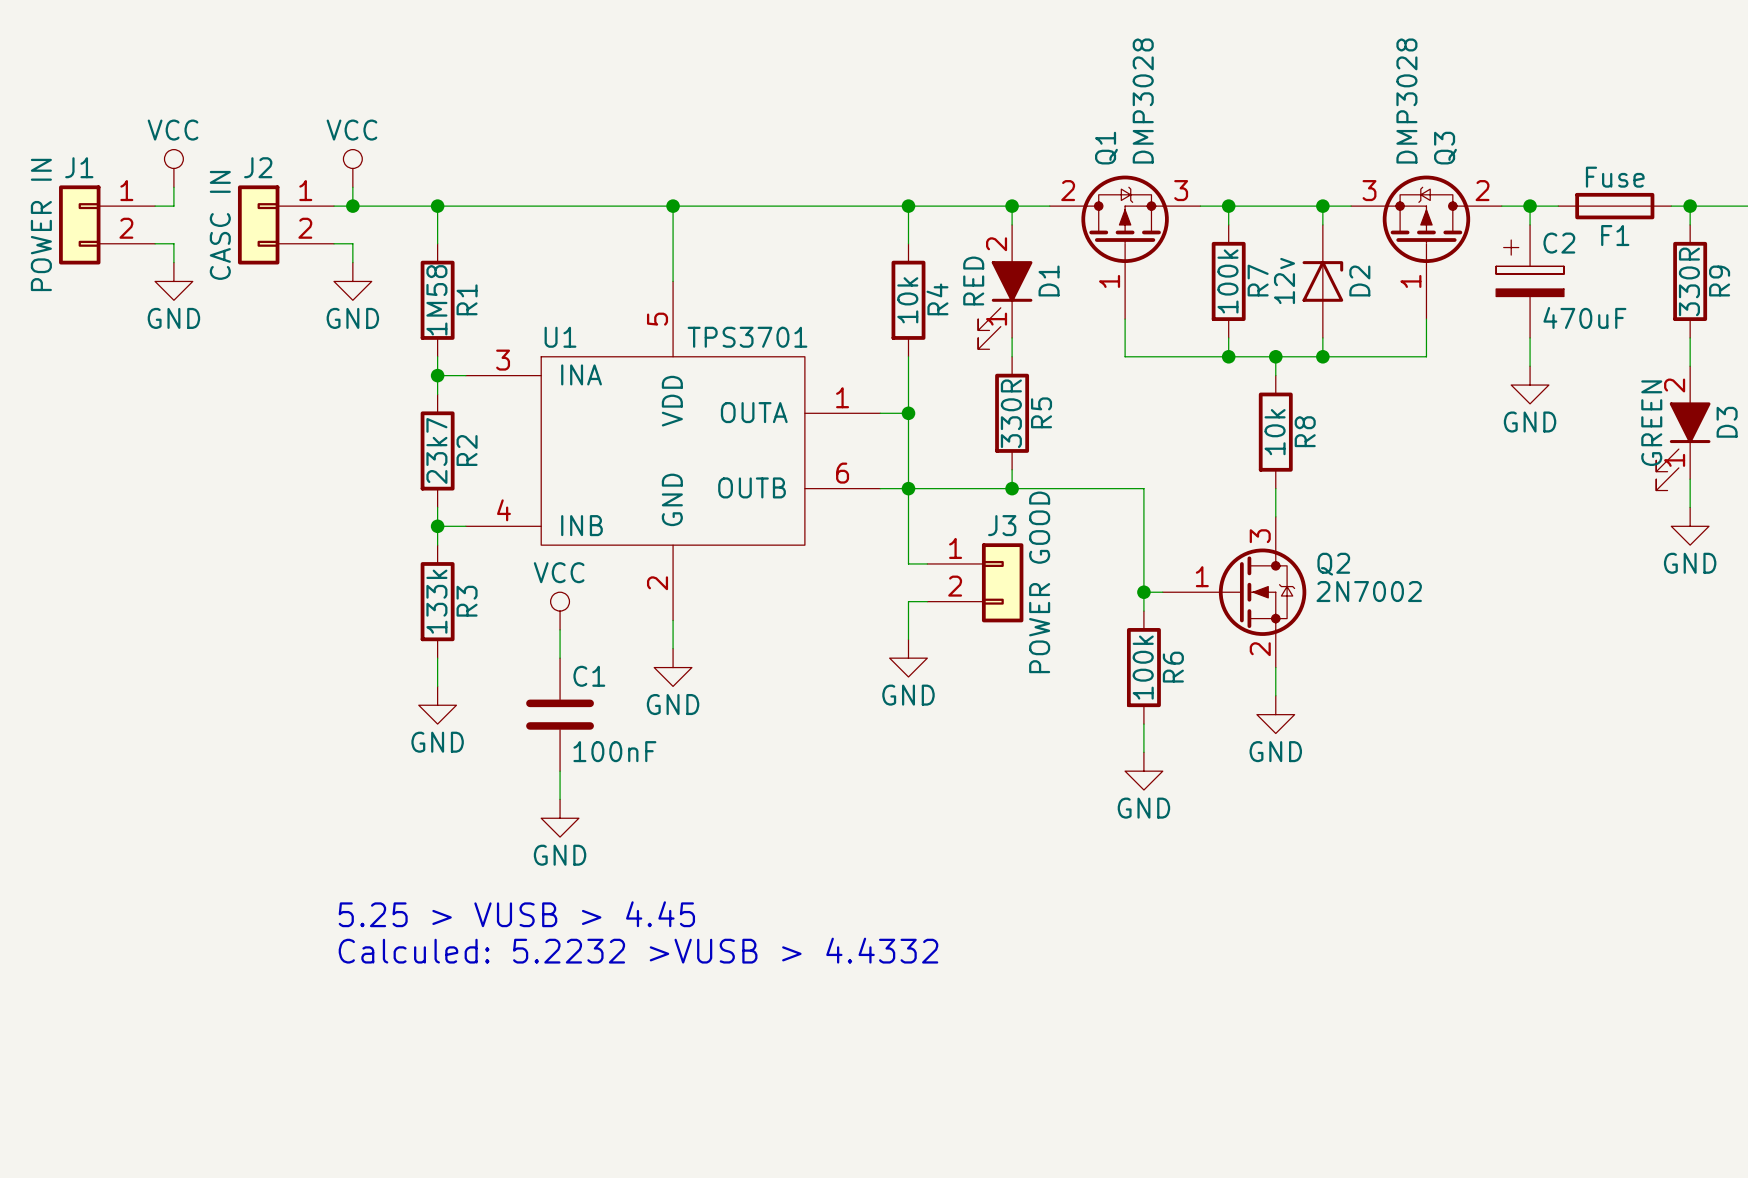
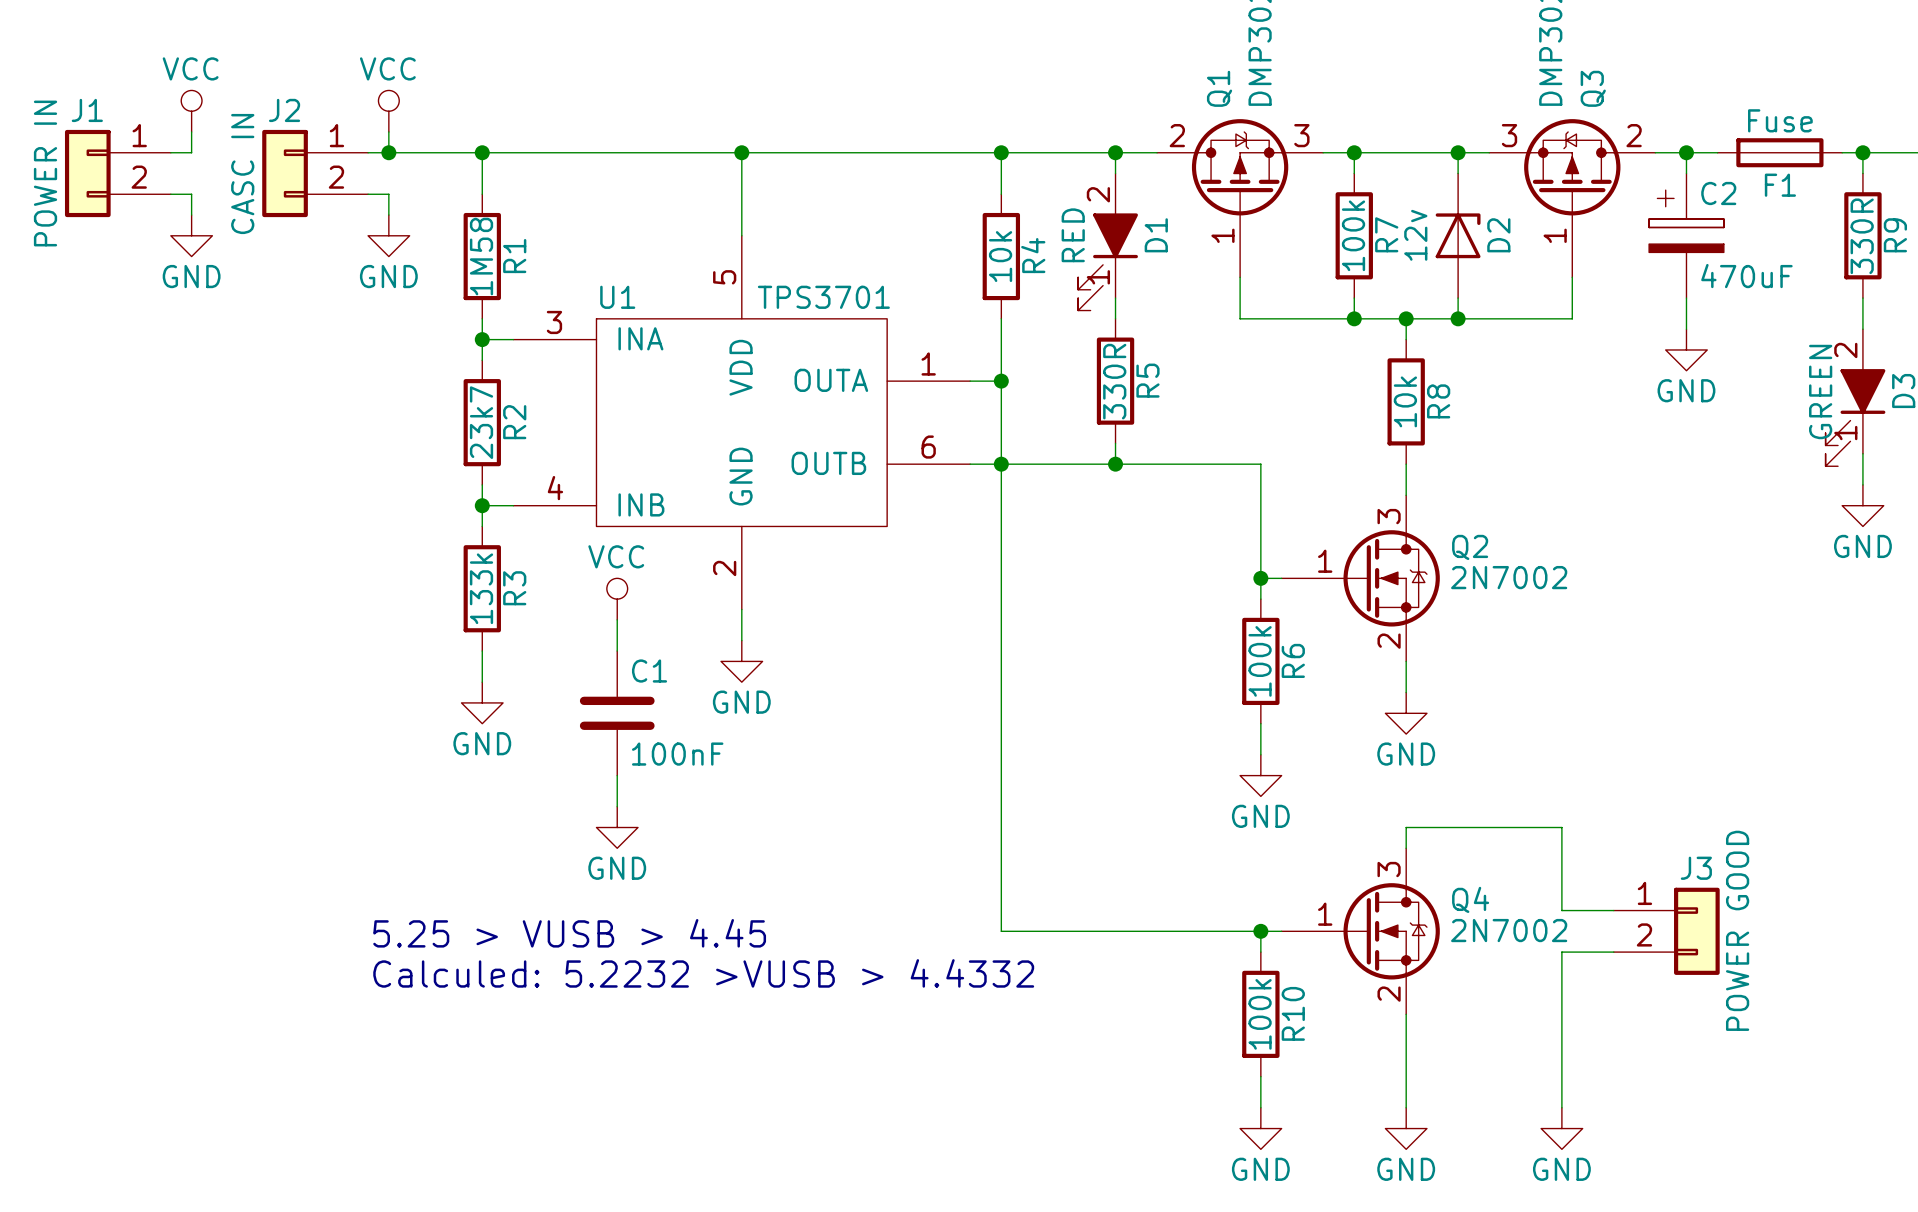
wire: (908, 563) (927, 563) -> (1001, 547) (1001, 588)
J3 position: (975, 582) -> (1666, 931)
wire: (908, 601) (927, 601) -> none
wire: none -> (1001, 630) (1001, 931) (1281, 931)
power symbol: GND (908, 658) -> none
wire: none -> (1406, 848) (1406, 827) (1561, 827) (1561, 910) (1613, 910)
wire: none -> (1260, 931) (1260, 952)
junction: none -> (1260, 931)
Q4: none -> 2N7002 (1360, 931)
wire: none -> (1613, 952) (1561, 952) (1561, 1107)
R10: none -> 100k (1260, 1014)
wire: none -> (1406, 1014) (1406, 1107)
wire: none -> (1260, 1076) (1260, 1107)
power symbol: none -> GND (1260, 1128)
power symbol: none -> GND (1406, 1128)
power symbol: none -> GND (1561, 1128)

